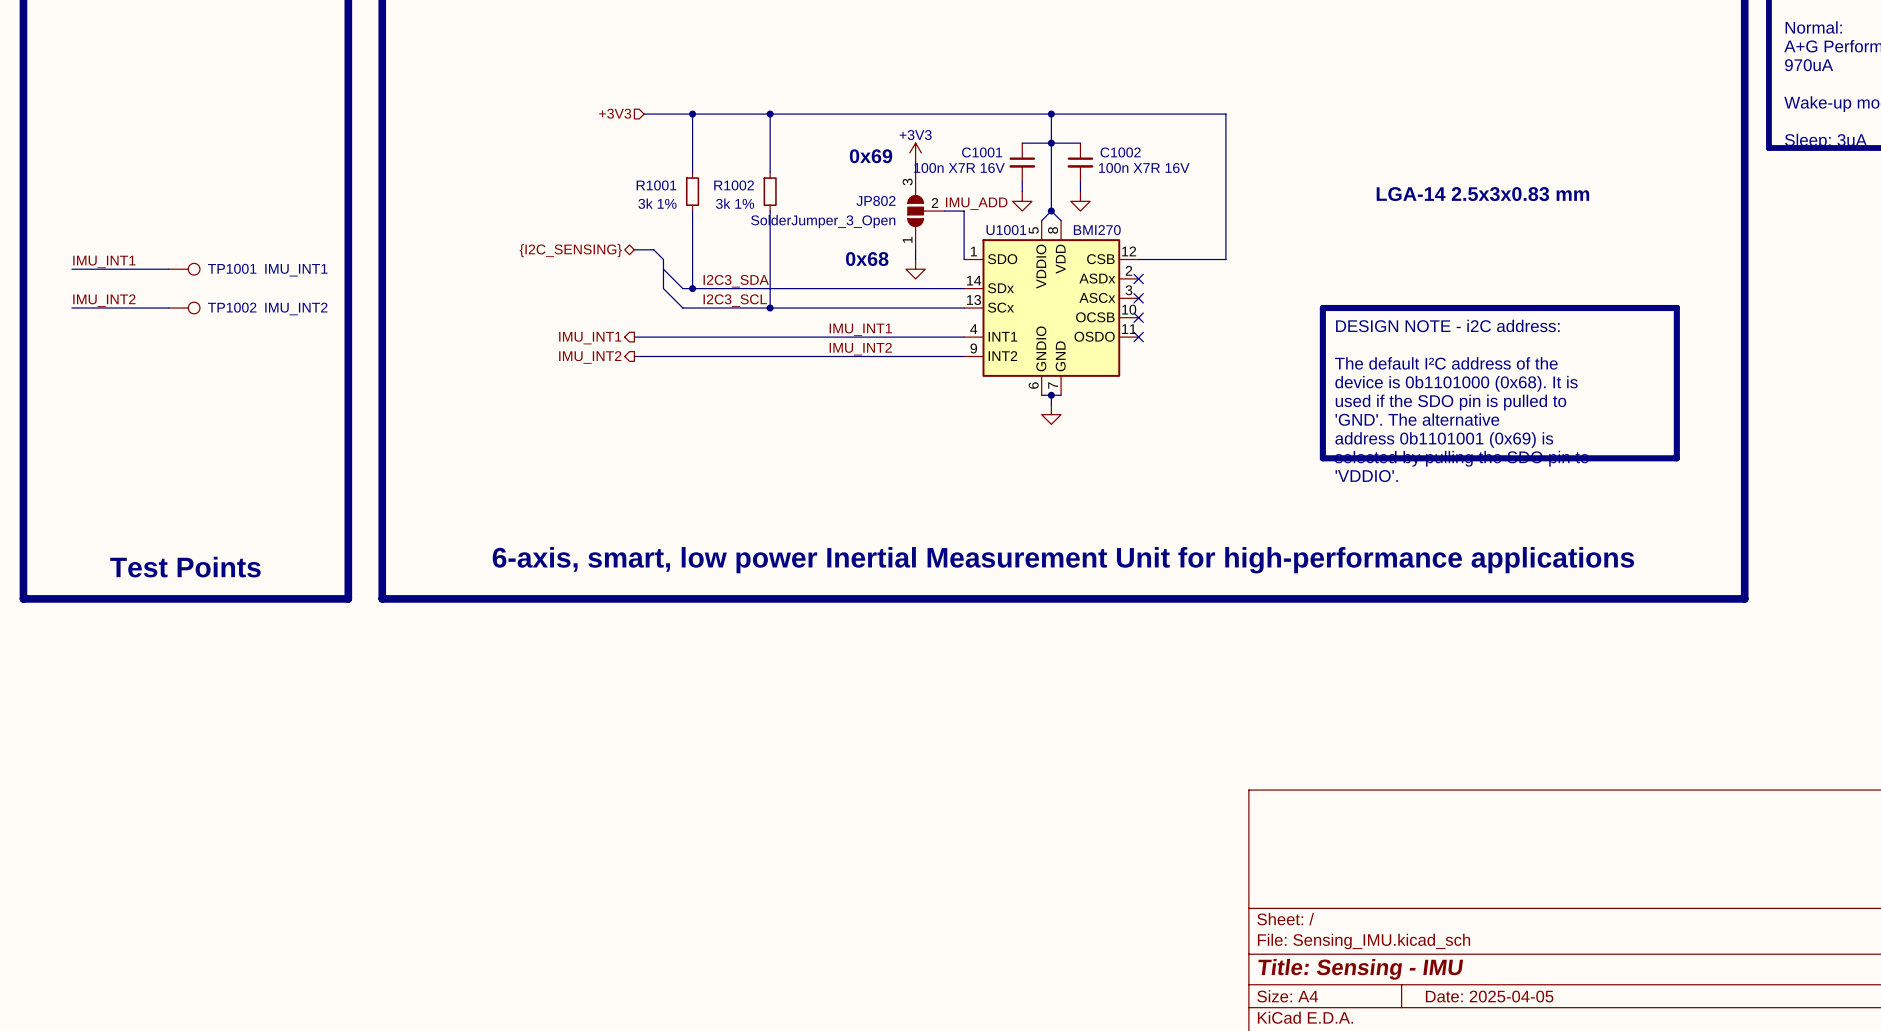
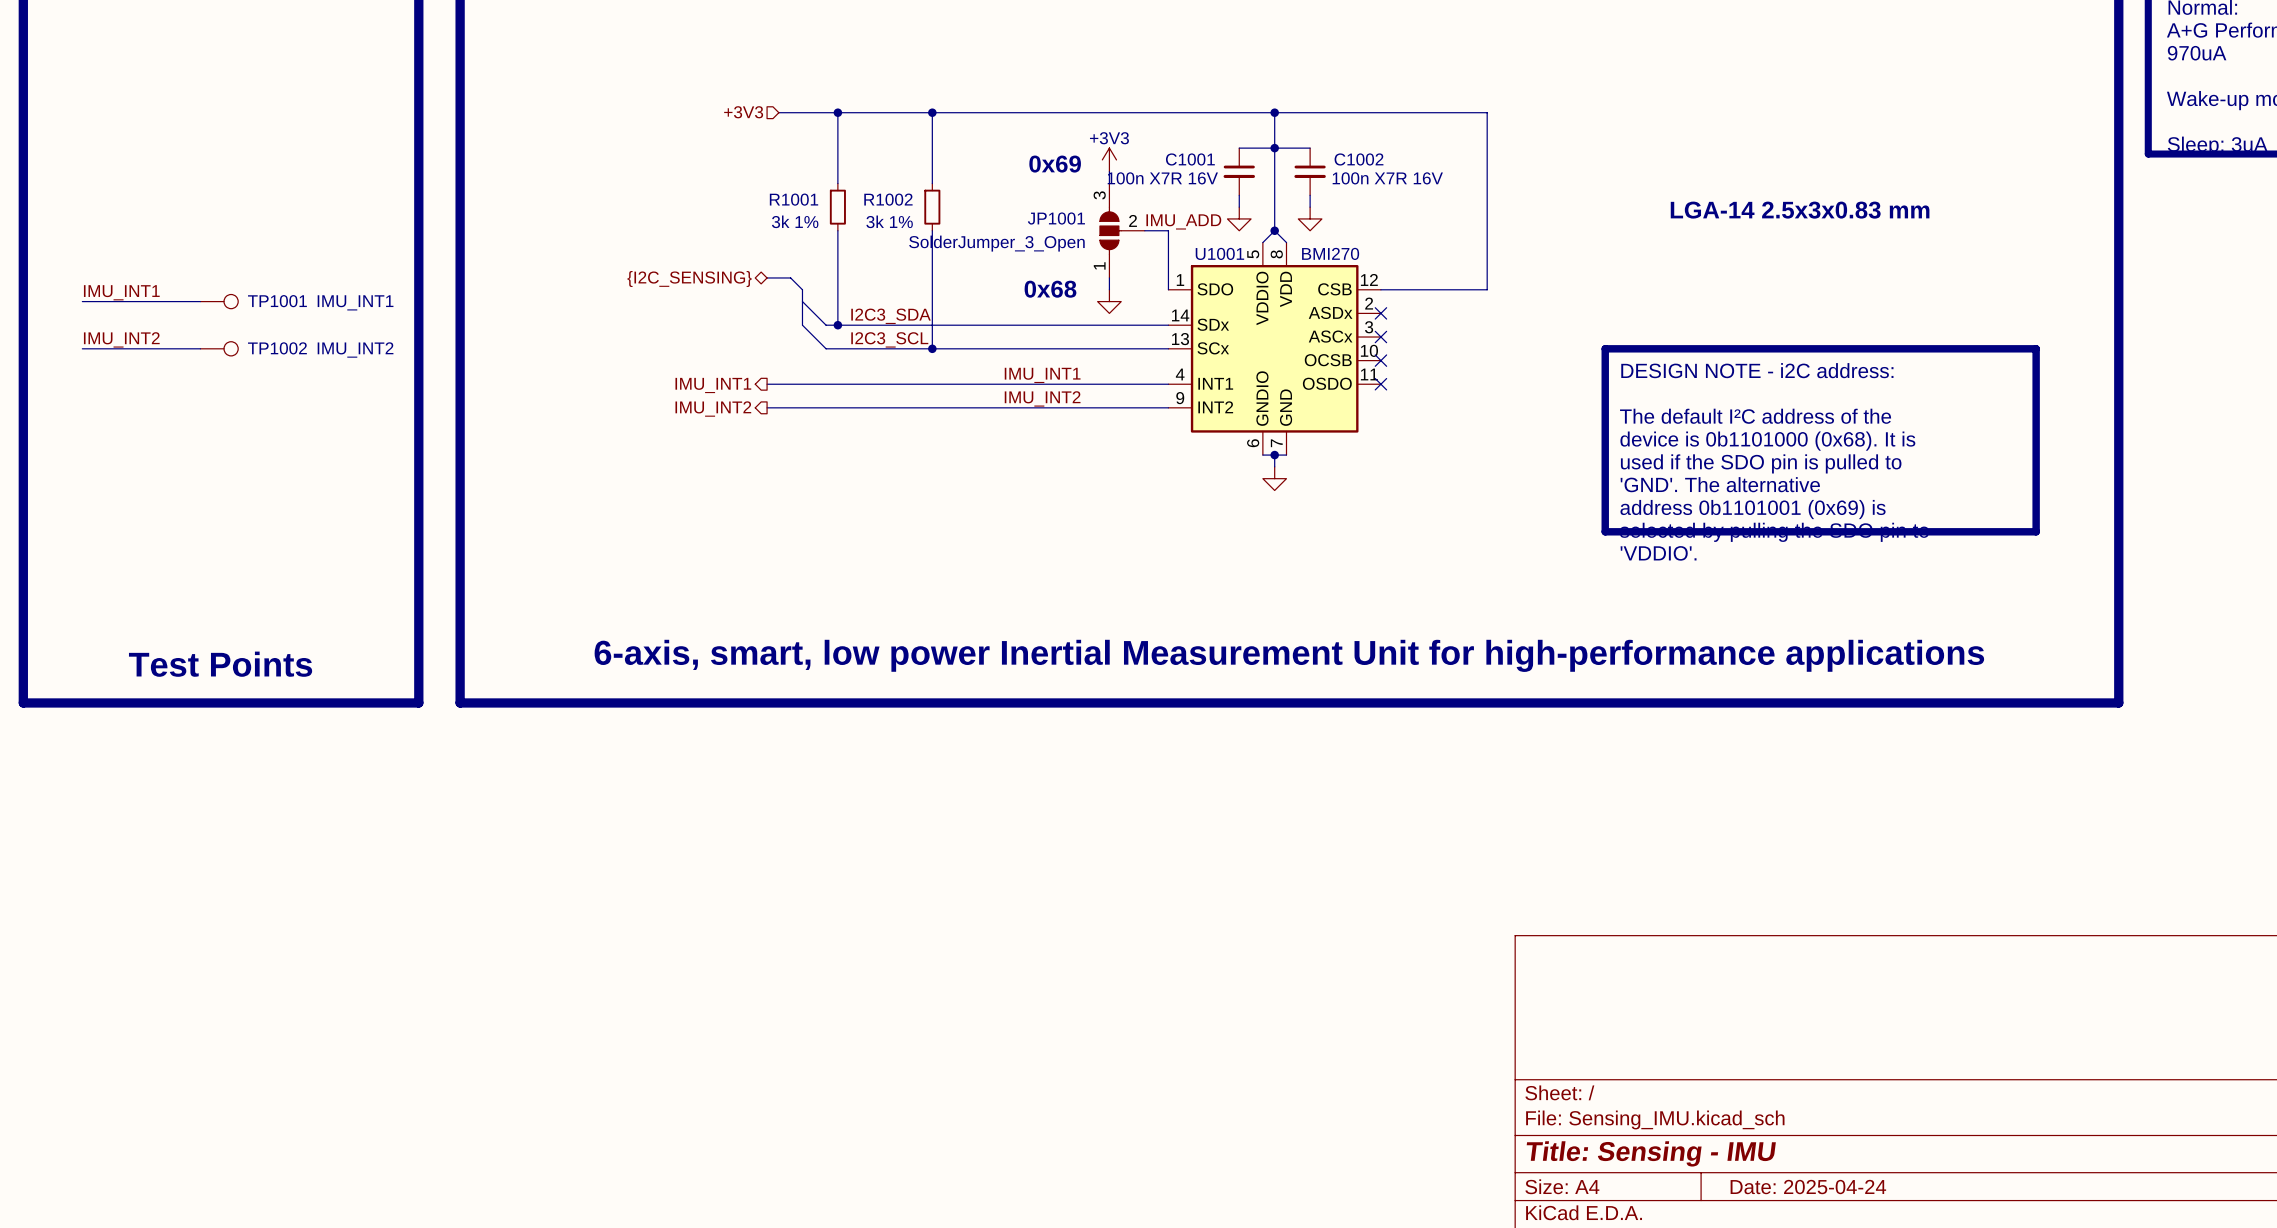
JP802 name: JP802 (875, 200) -> JP1001 (1056, 218)
title block: Date: 2025-04-05 (1489, 996) -> Date: 2025-04-24 (1808, 1187)

